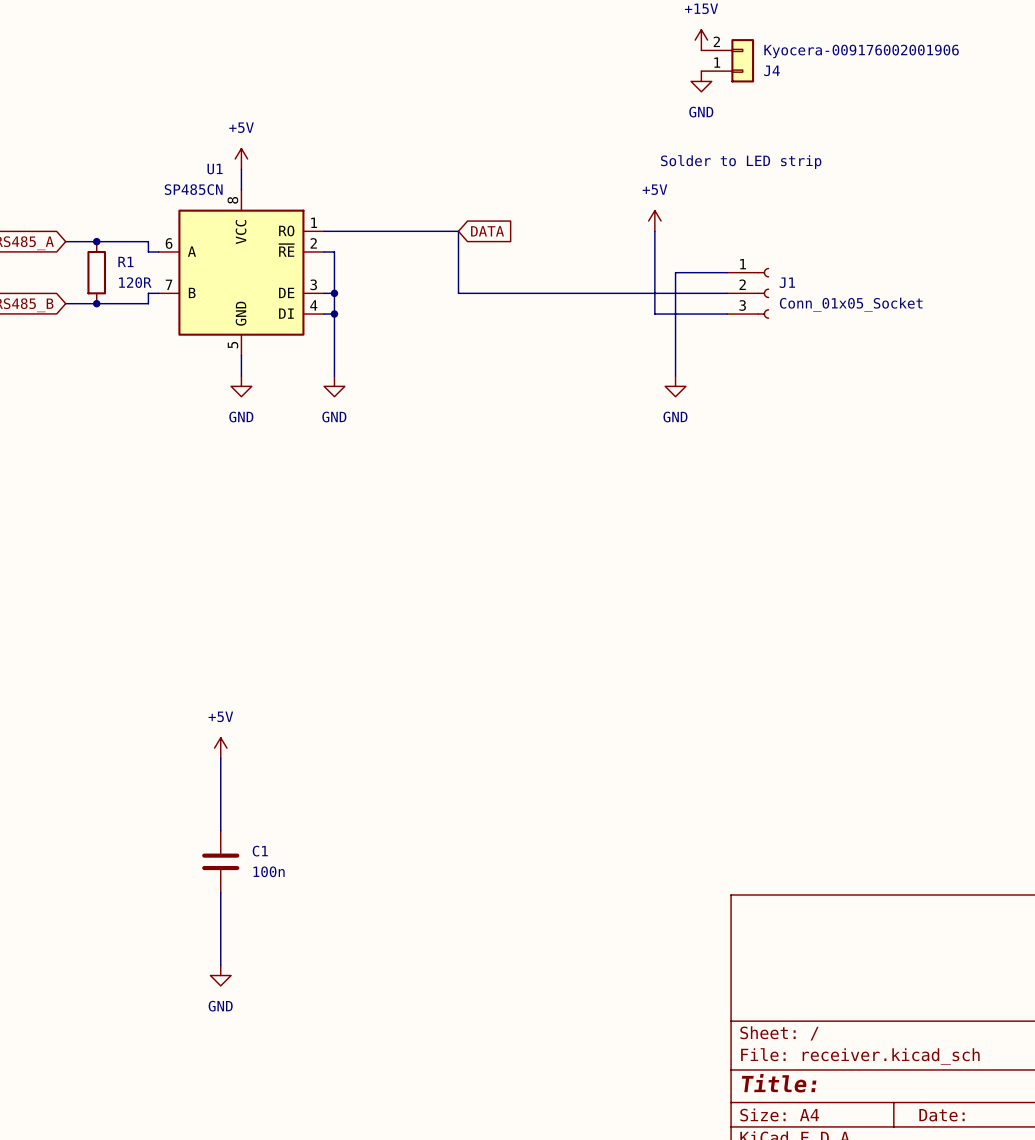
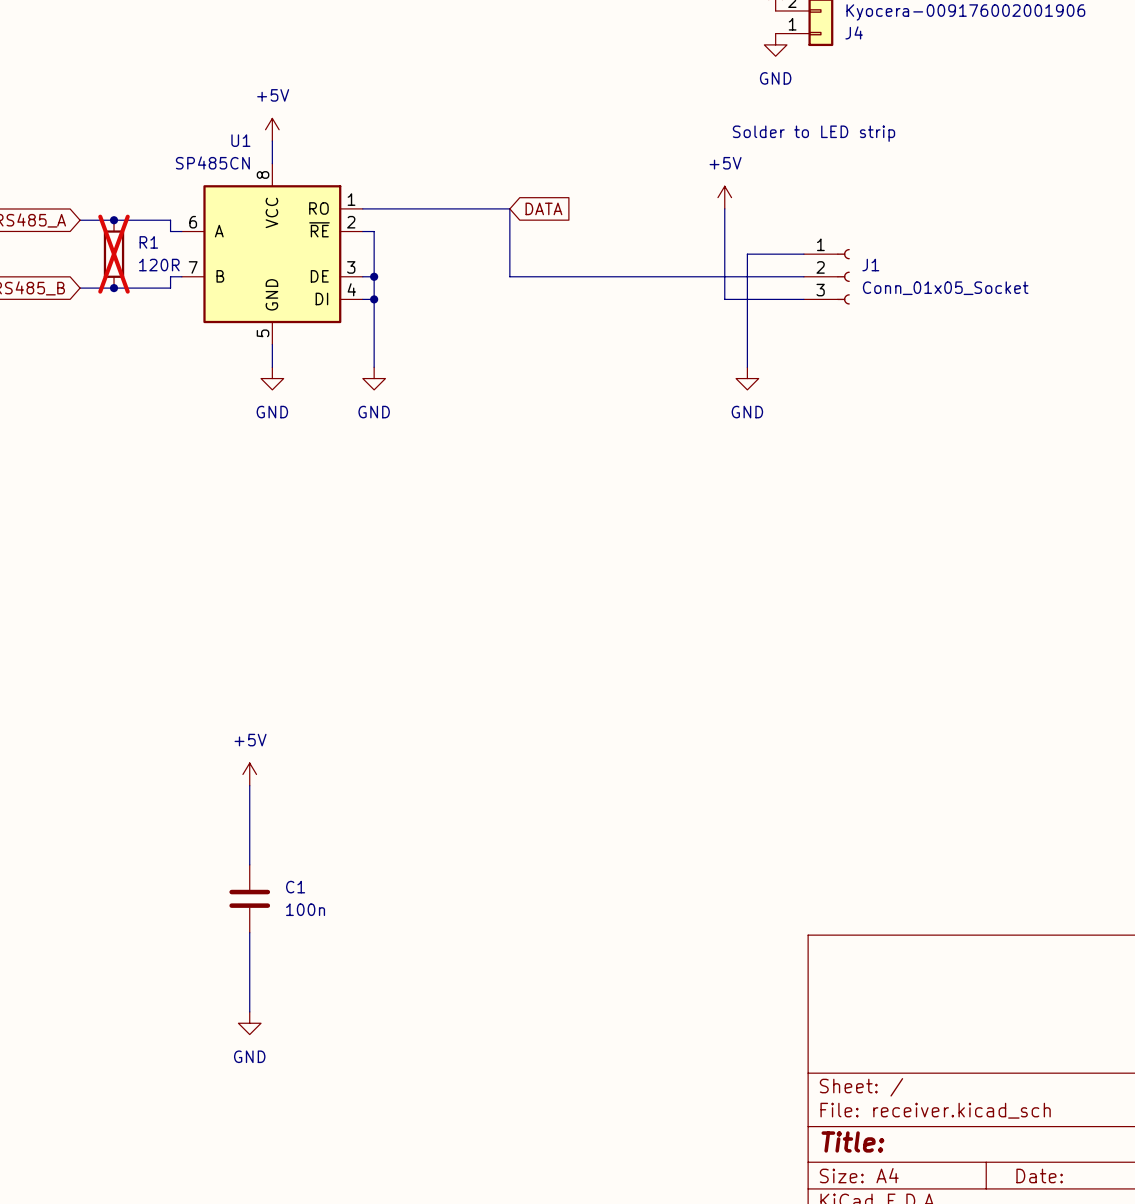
R1 do-not-place cross: none -> (114, 254)

